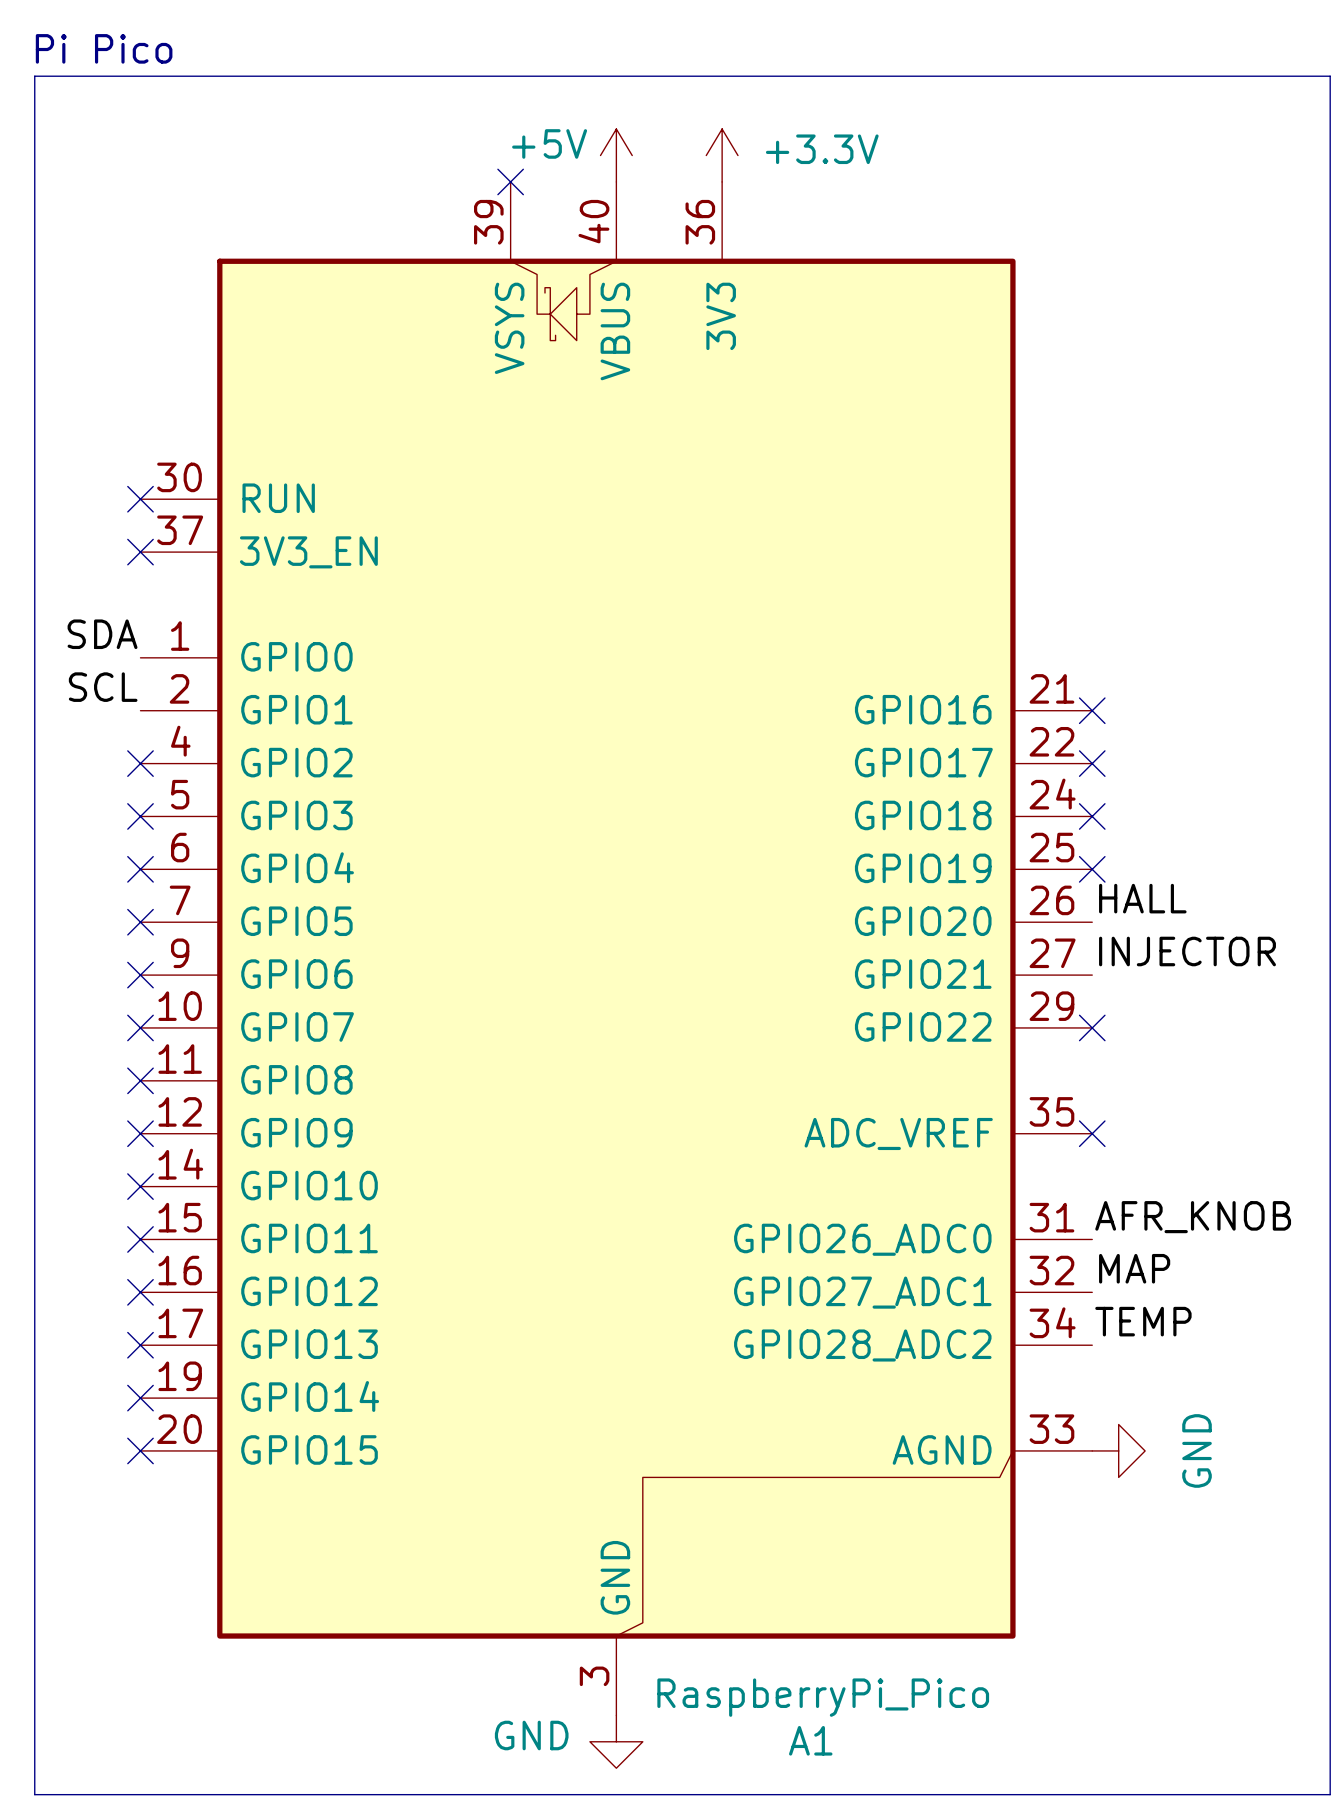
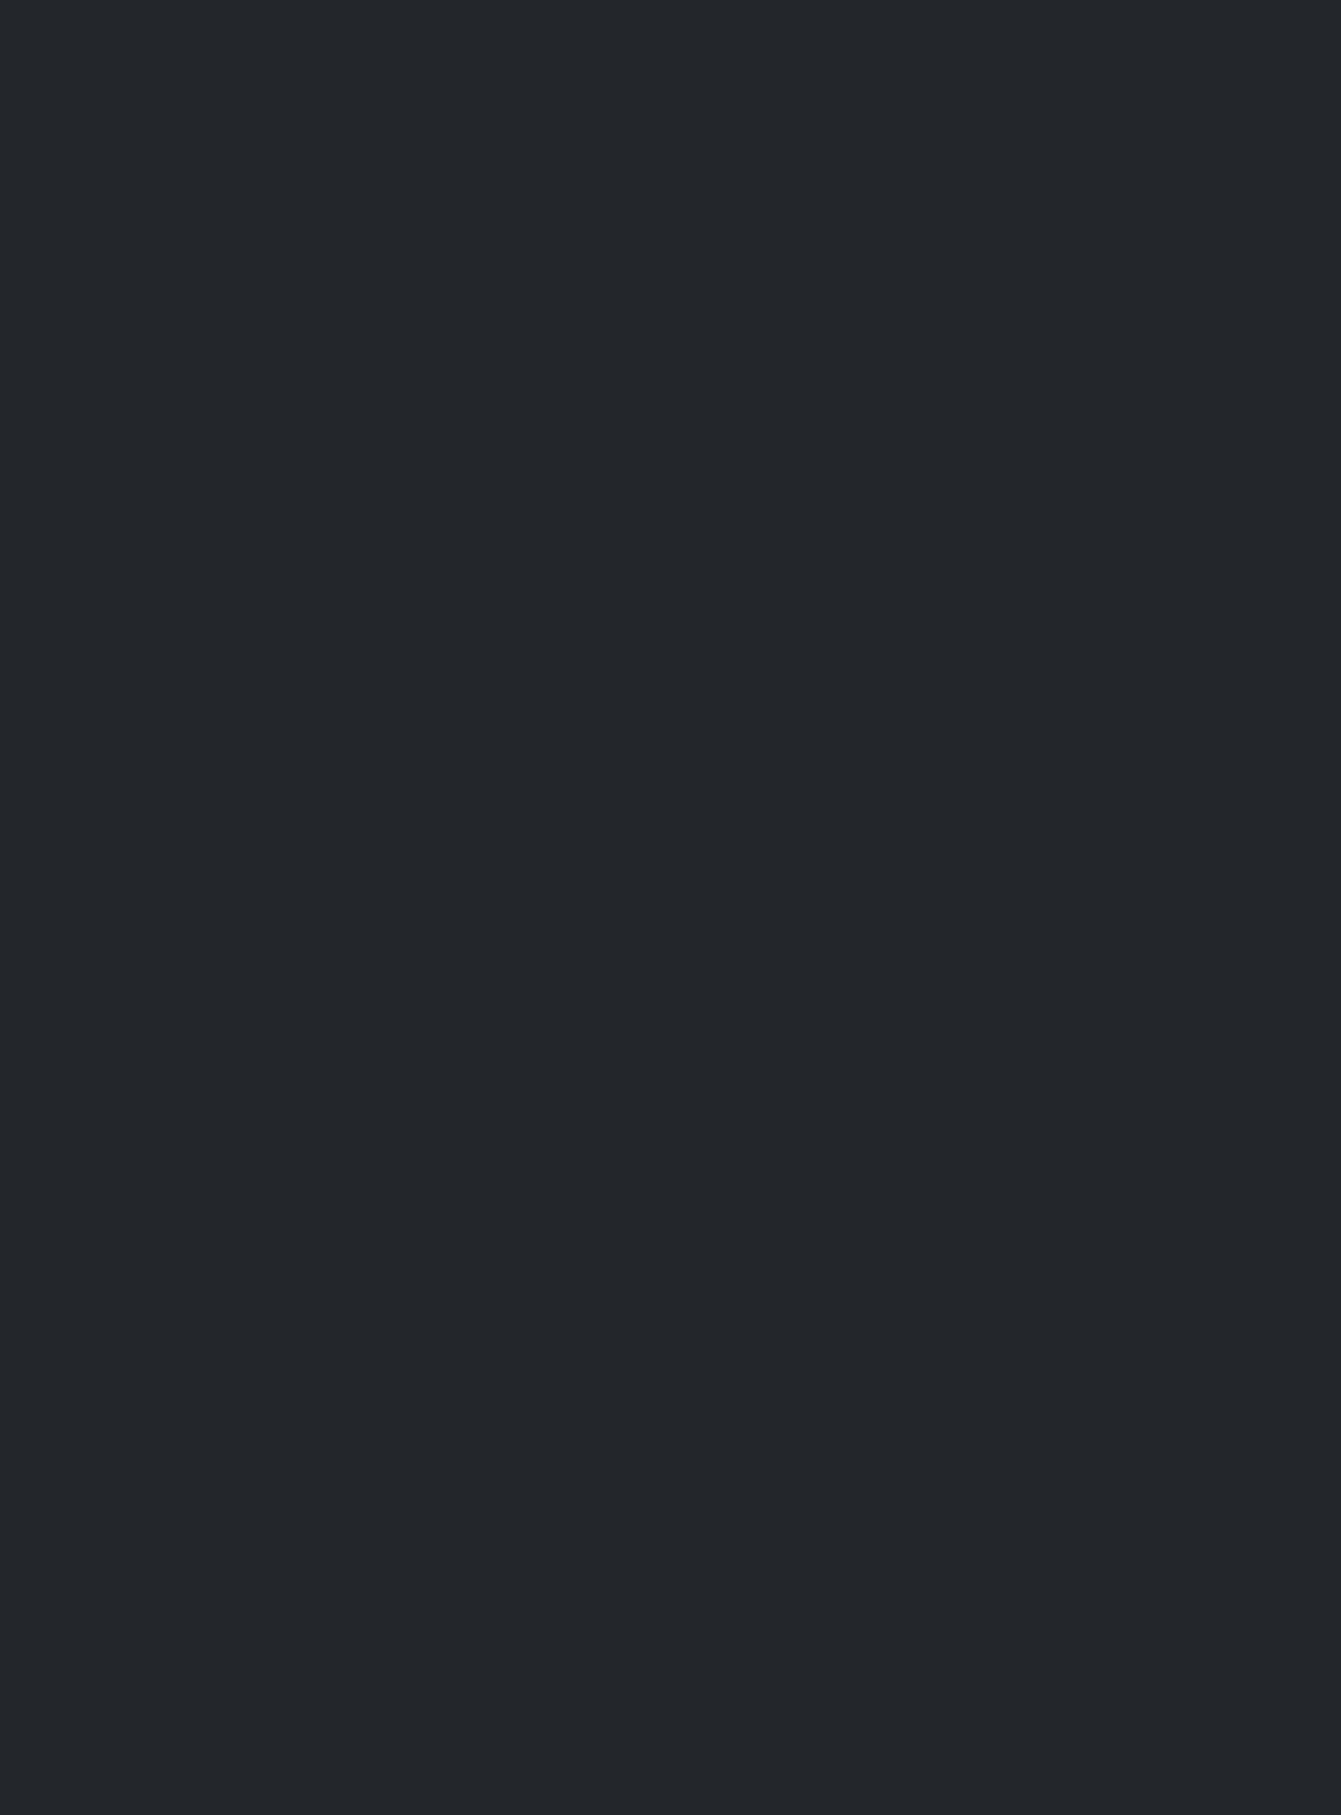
text: Pi Pico (104, 48) -> none
line: (34, 76) (1330, 76) (1330, 1794) (34, 1794) (34, 76) -> none
power symbol: +5V (616, 155) -> none
power symbol: +3.3V (722, 155) -> none
no-connect mark: (510, 181) -> none
no-connect mark: (140, 499) -> none
no-connect mark: (140, 552) -> none
label: SDA (102, 634) -> none
label: SCL (103, 687) -> none
no-connect mark: (1092, 710) -> none
no-connect mark: (140, 763) -> none
no-connect mark: (1092, 763) -> none
no-connect mark: (140, 816) -> none
no-connect mark: (1092, 816) -> none
no-connect mark: (140, 869) -> none
no-connect mark: (1092, 869) -> none
label: HALL (1142, 898) -> none
no-connect mark: (140, 922) -> none
A1: RaspberryPi_Pico (616, 948) -> none
label: INJECTOR (1187, 951) -> none
no-connect mark: (140, 975) -> none
no-connect mark: (140, 1027) -> none
no-connect mark: (1092, 1027) -> none
no-connect mark: (140, 1080) -> none
no-connect mark: (140, 1133) -> none
no-connect mark: (1092, 1133) -> none
no-connect mark: (140, 1186) -> none
label: AFR_KNOB (1193, 1217) -> none
no-connect mark: (140, 1239) -> none
label: MAP (1134, 1268) -> none
no-connect mark: (140, 1292) -> none
label: TEMP (1143, 1321) -> none
no-connect mark: (140, 1345) -> none
no-connect mark: (140, 1398) -> none
no-connect mark: (140, 1450) -> none
power symbol: GND (1118, 1450) -> none
power symbol: GND (616, 1741) -> none

